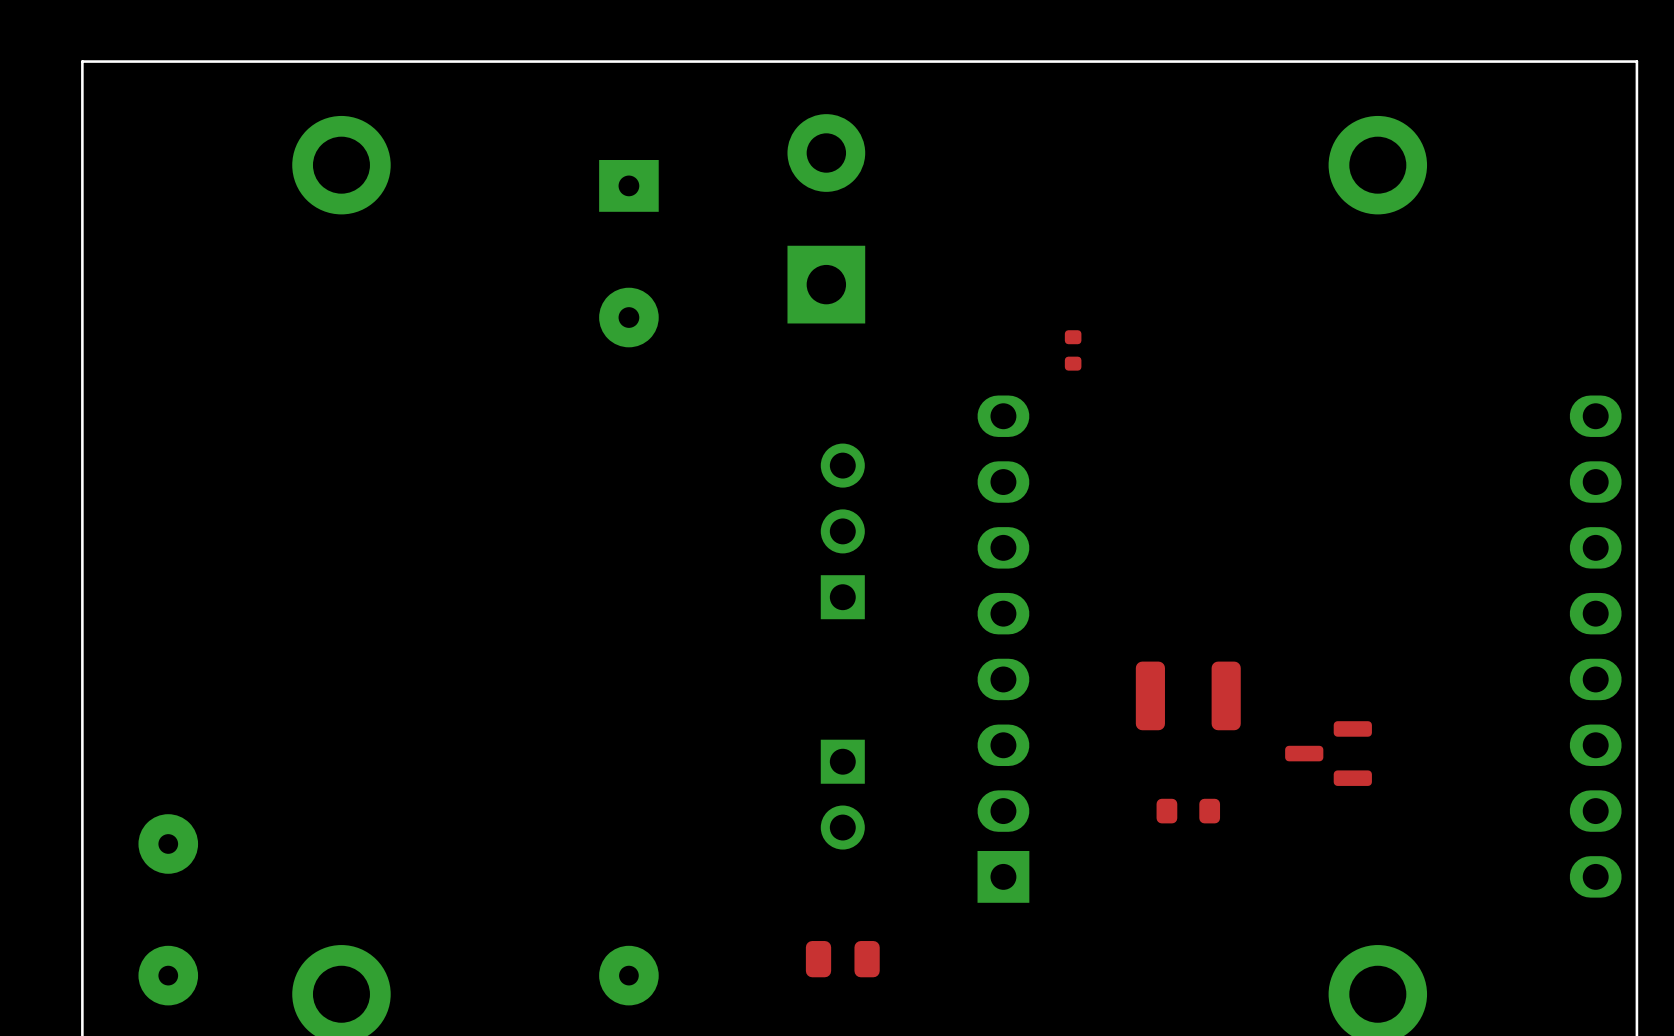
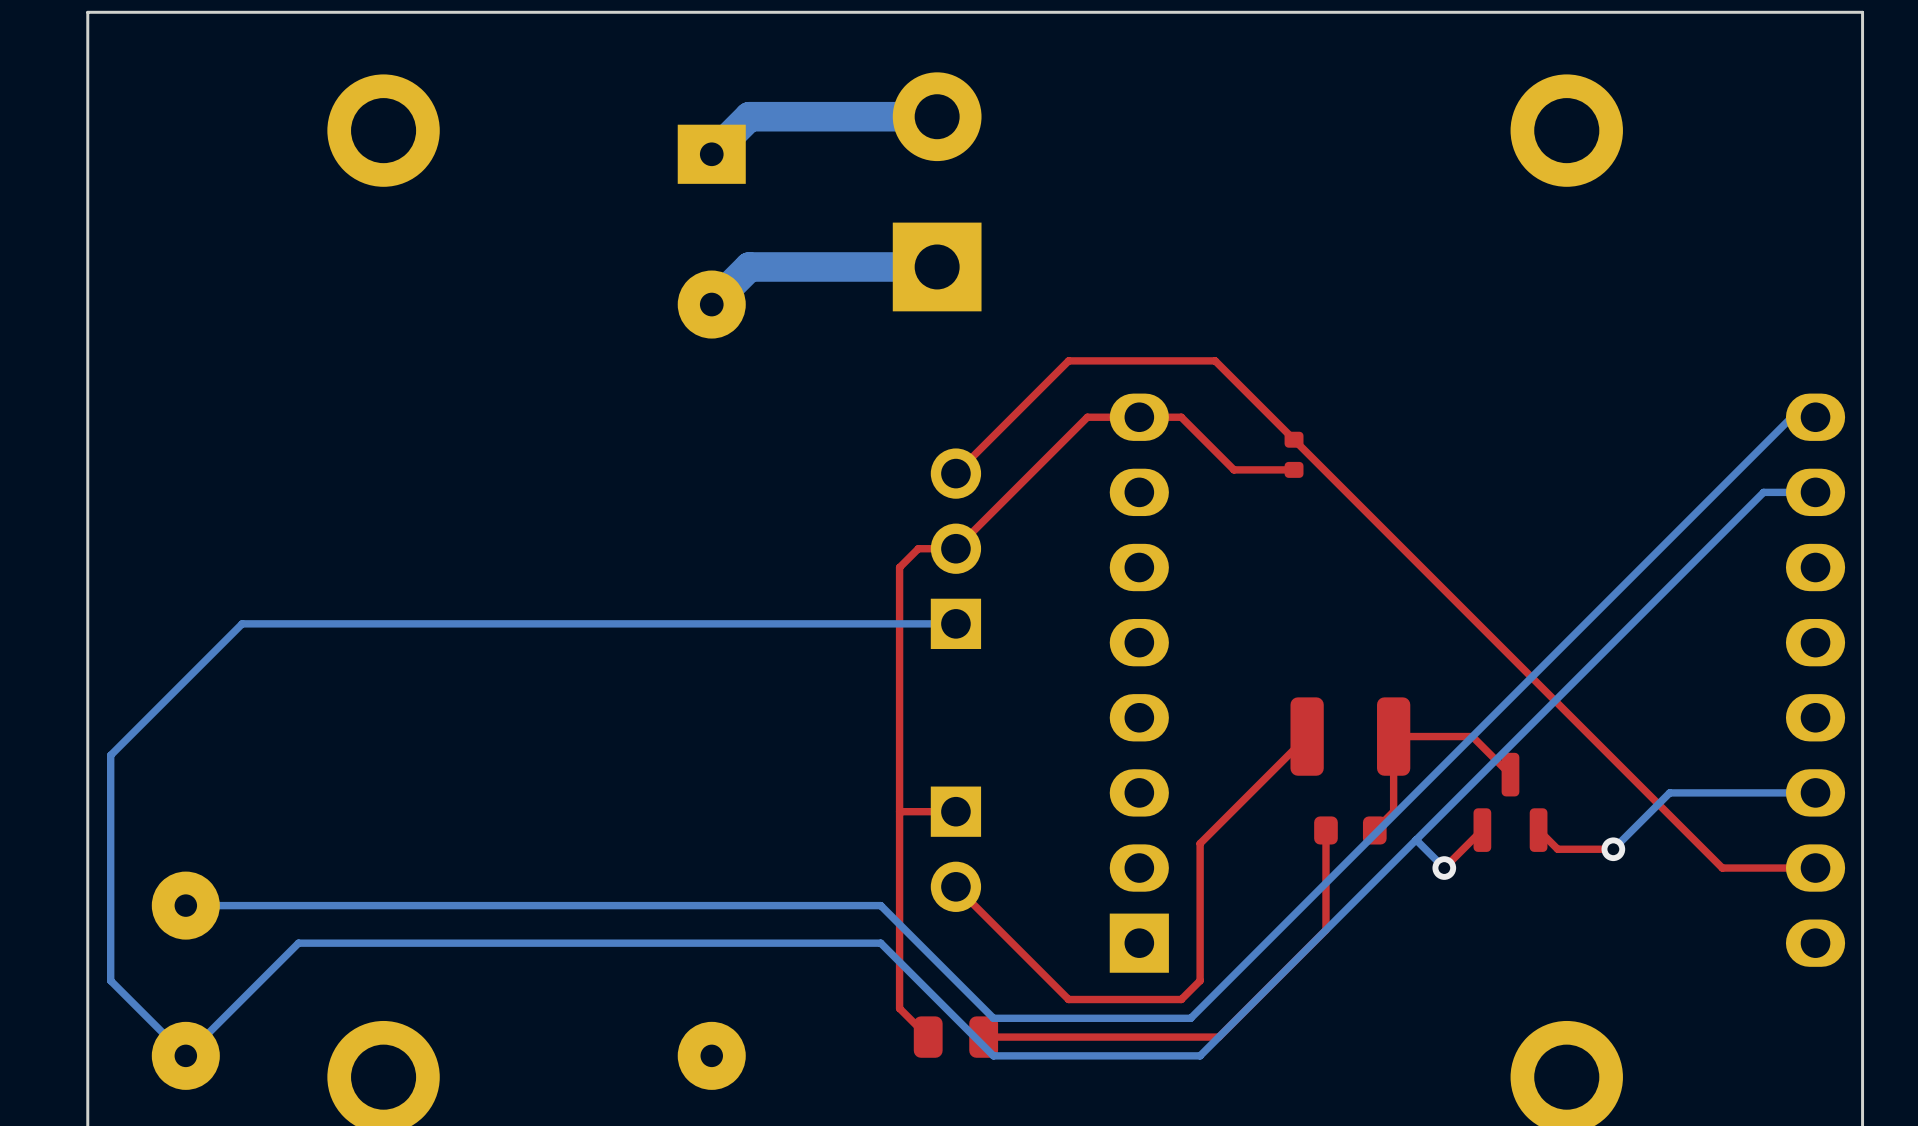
bottom track: none -> (937, 116) (749, 116) (711, 154)
bottom track: none -> (937, 266) (749, 266) (711, 304)
part position: (1073, 350) -> (1294, 454)
bottom track: none -> (1815, 417) (1791, 417) (1190, 1018) (993, 1018) (880, 905) (185, 905)
top track: none -> (1294, 469) (1233, 469) (1181, 417) (1087, 417) (955, 548) (918, 548) (899, 567) (899, 1008) (928, 1037)
top track: none -> (955, 473) (1068, 360) (1215, 360) (1722, 868) (1815, 868)
bottom track: none -> (1815, 492) (1763, 492) (1200, 1055) (993, 1055) (880, 943) (298, 943) (185, 1055) (110, 980) (110, 755) (242, 623) (955, 623)
top track: none -> (1307, 736) (1200, 843) (1200, 980) (1181, 999) (1068, 999) (955, 886)
top track: none -> (1510, 774) (1472, 736) (1393, 736) (1393, 811) (1374, 830)
bottom track: none -> (1815, 792) (1669, 792) (1613, 849)
part rotation: 0° (1328, 753) -> 90° clockwise (1510, 802)
top track: none -> (955, 811) (899, 811)
top track: none -> (1482, 830) (1444, 868)
top track: none -> (1538, 830) (1557, 849) (1613, 849)
top track: none -> (1325, 830) (1325, 930) (1218, 1037) (983, 1037)
bottom track: none -> (1416, 839) (1444, 868)
via: none -> (1613, 849)
part position: (1188, 811) -> (1350, 830)
via: none -> (1444, 868)

